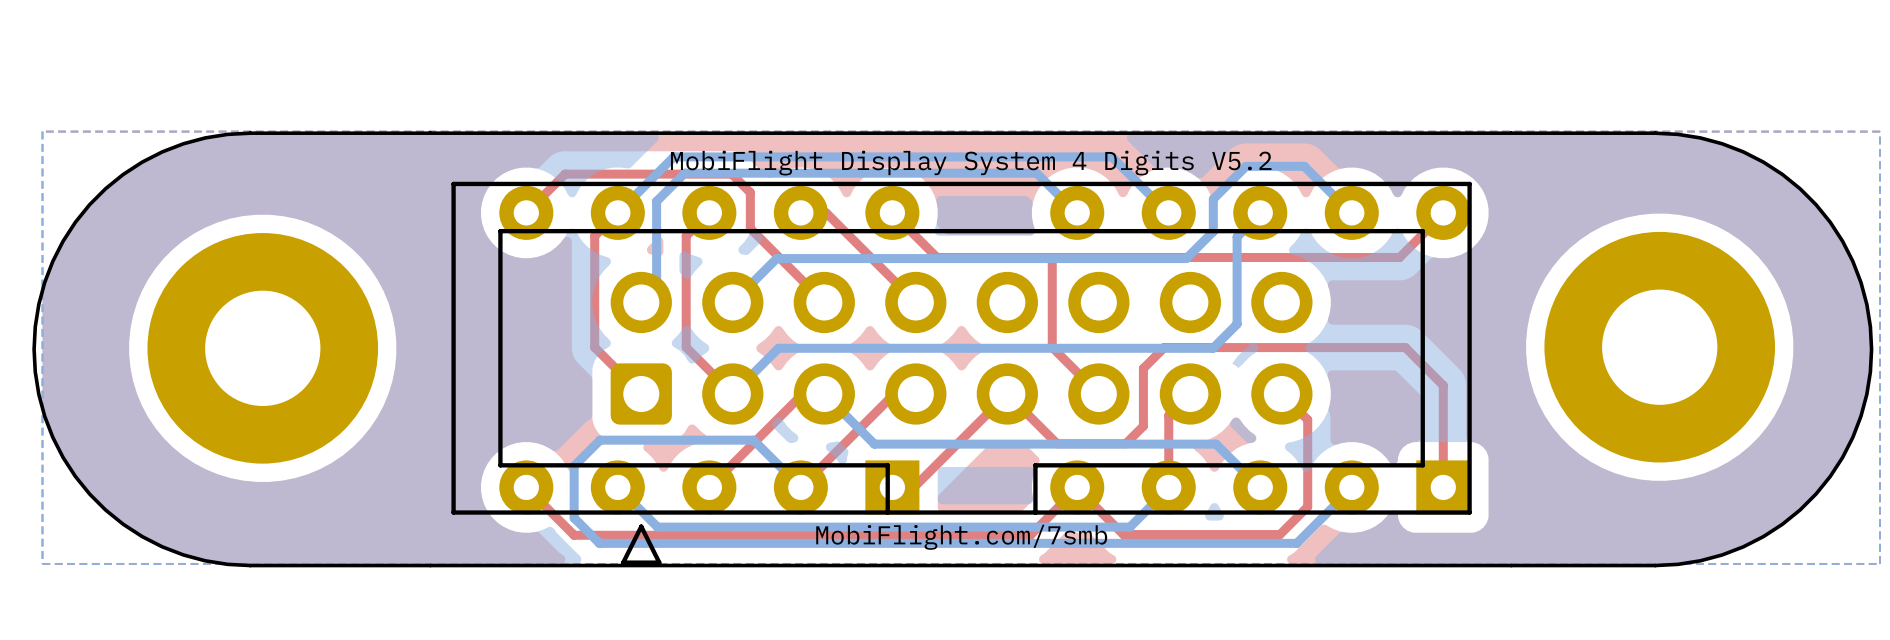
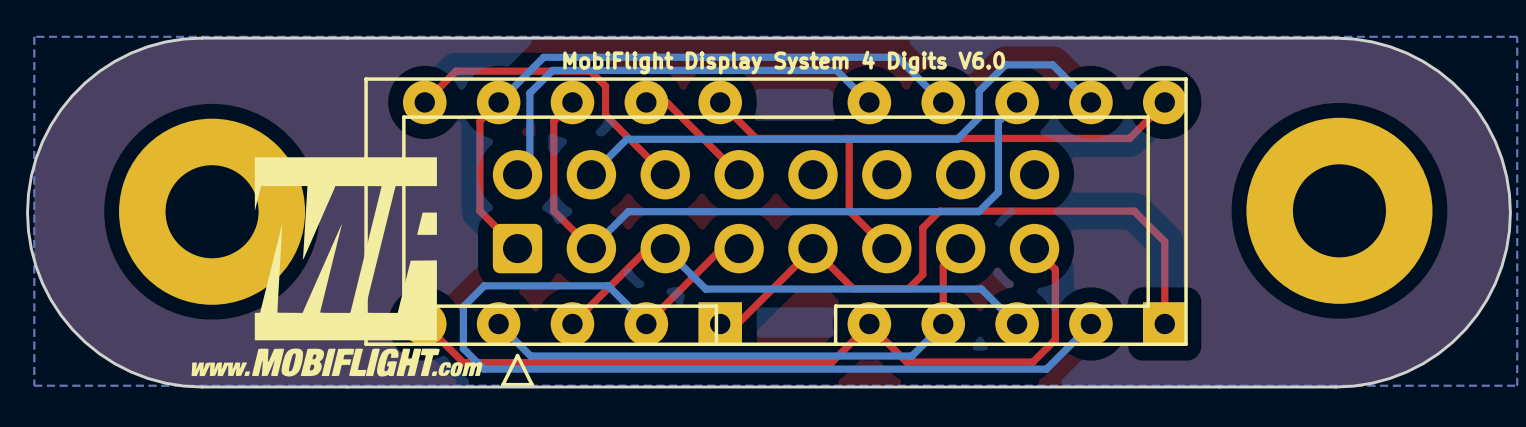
text: MobiFlight Display System 4 Digits V5.2 (971, 163) -> MobiFlight Display System 4 Digits V6.0 (784, 62)
drawing: none -> [191, 157, 483, 377]
text: MobiFlight.com/7smb (961, 537) -> none

